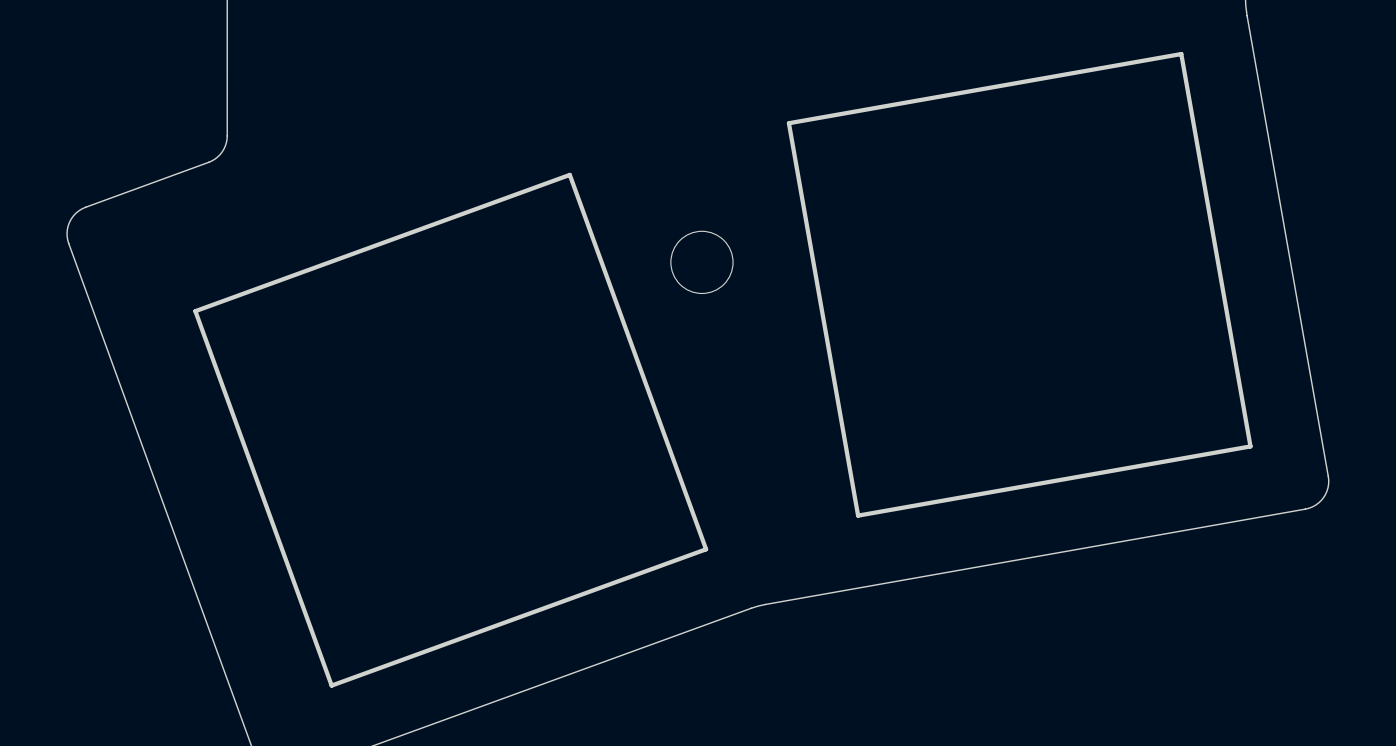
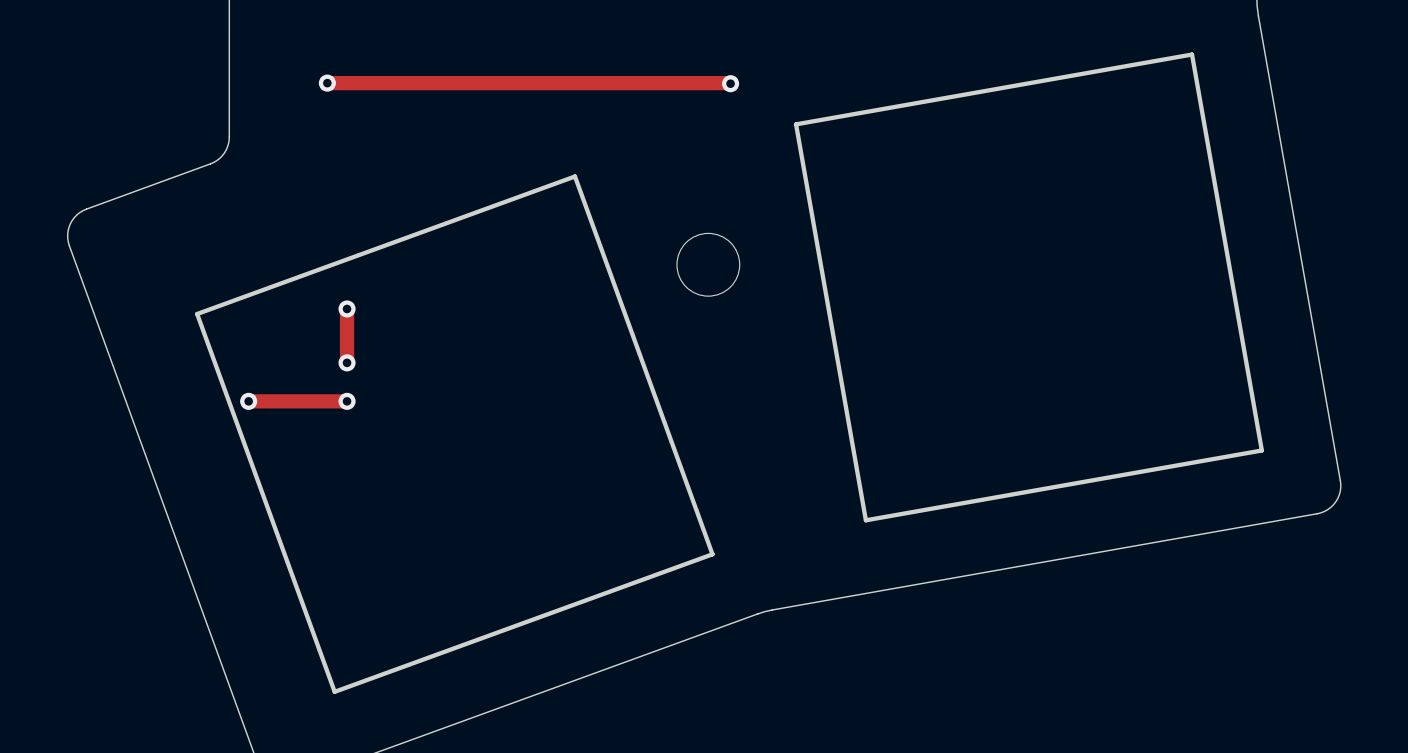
track: none -> (327, 83) (730, 83)
via: none -> (327, 83)
via: none -> (730, 83)
track: none -> (347, 308) (347, 362)
via: none -> (347, 308)
via: none -> (347, 362)
track: none -> (248, 401) (347, 401)
via: none -> (248, 401)
via: none -> (347, 401)

